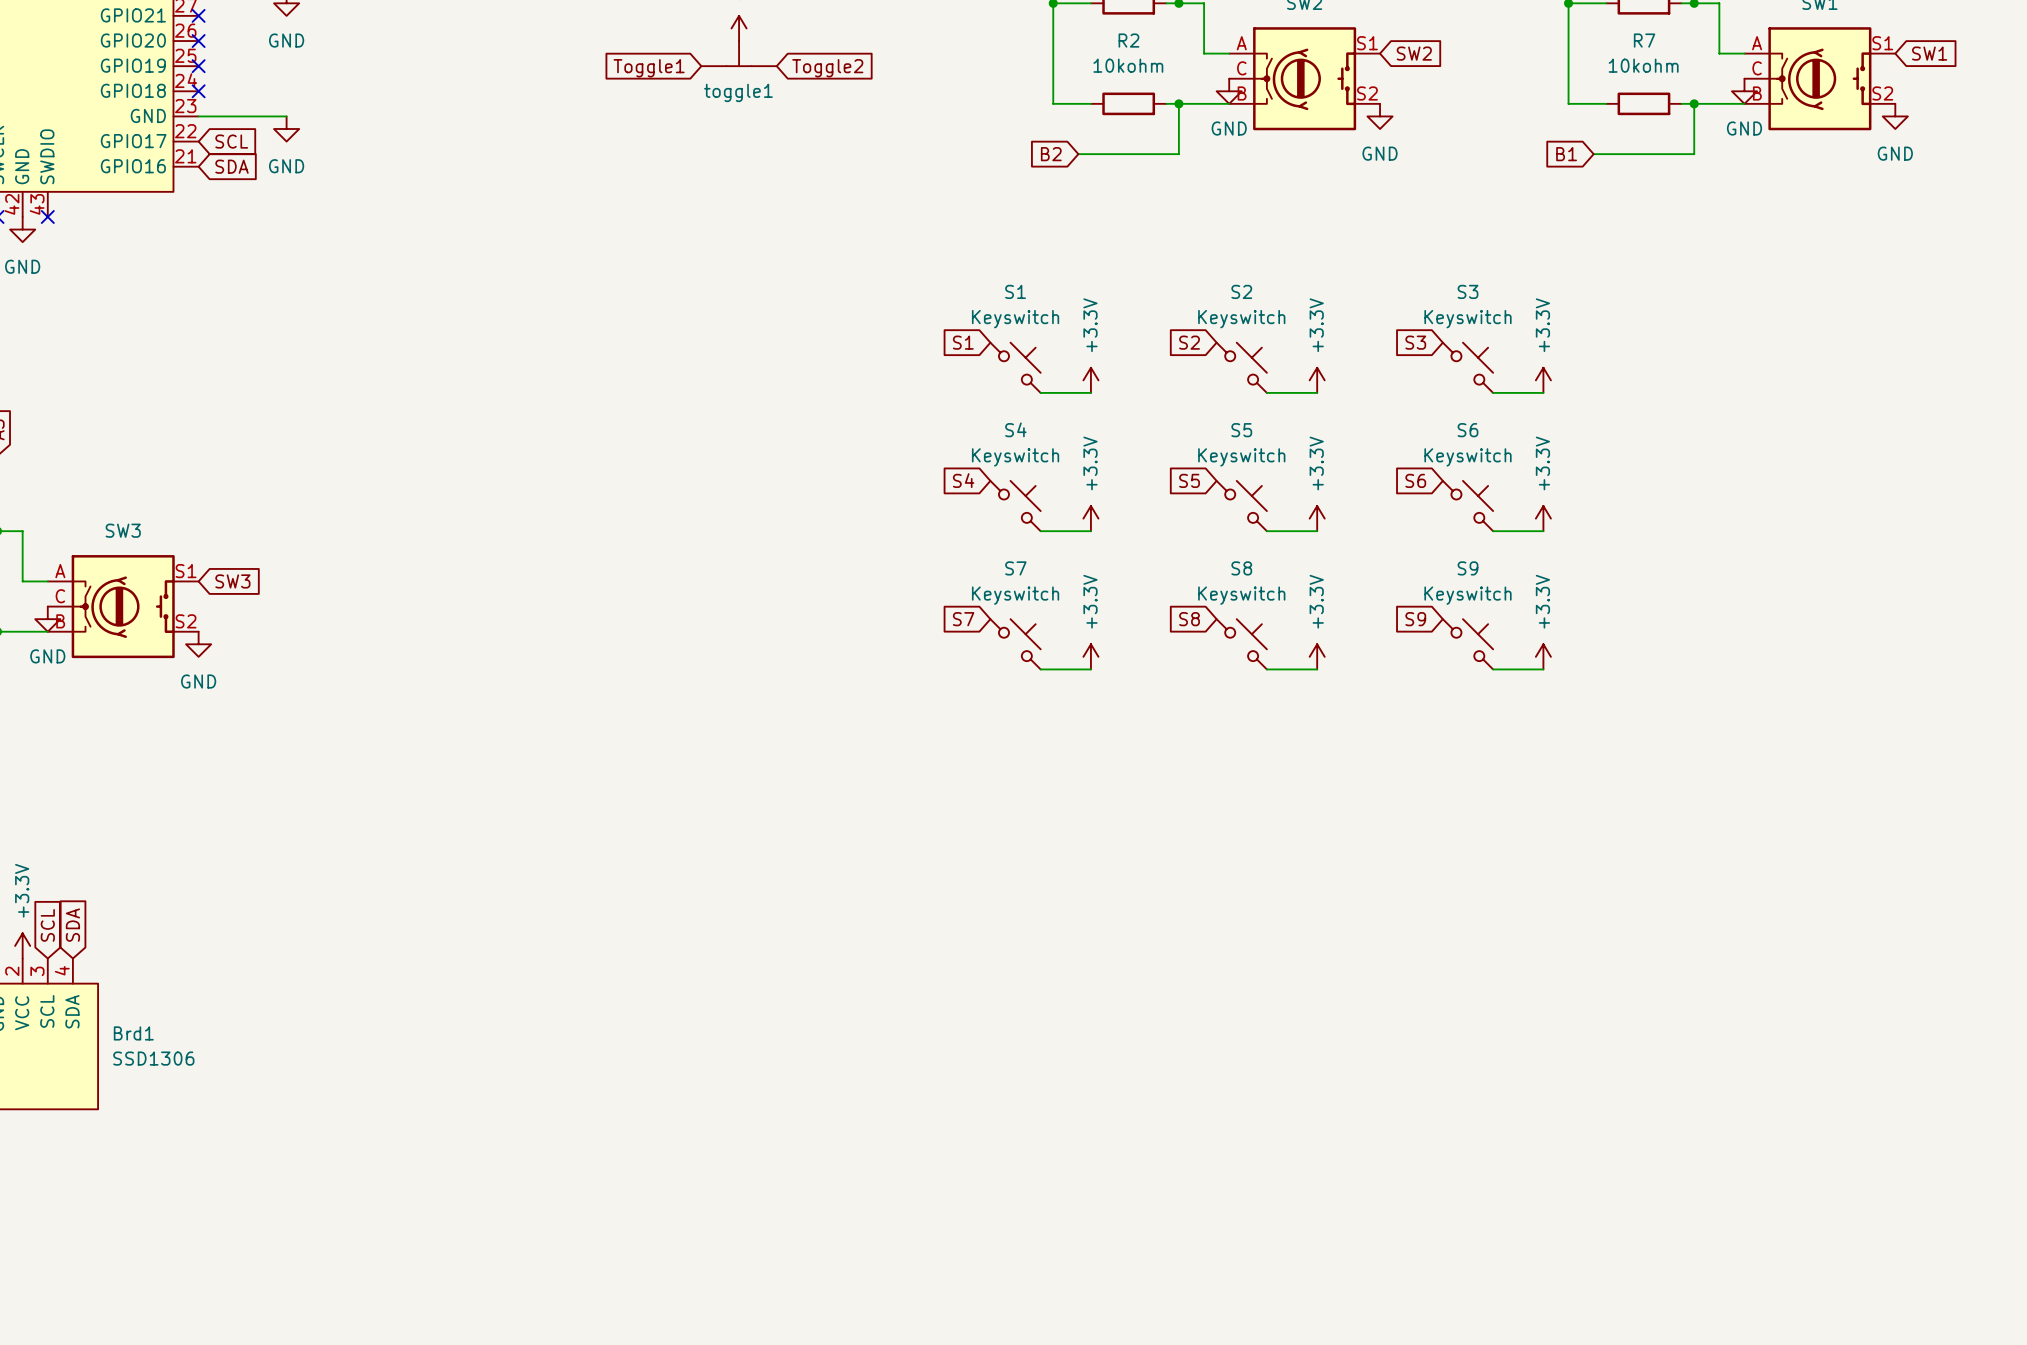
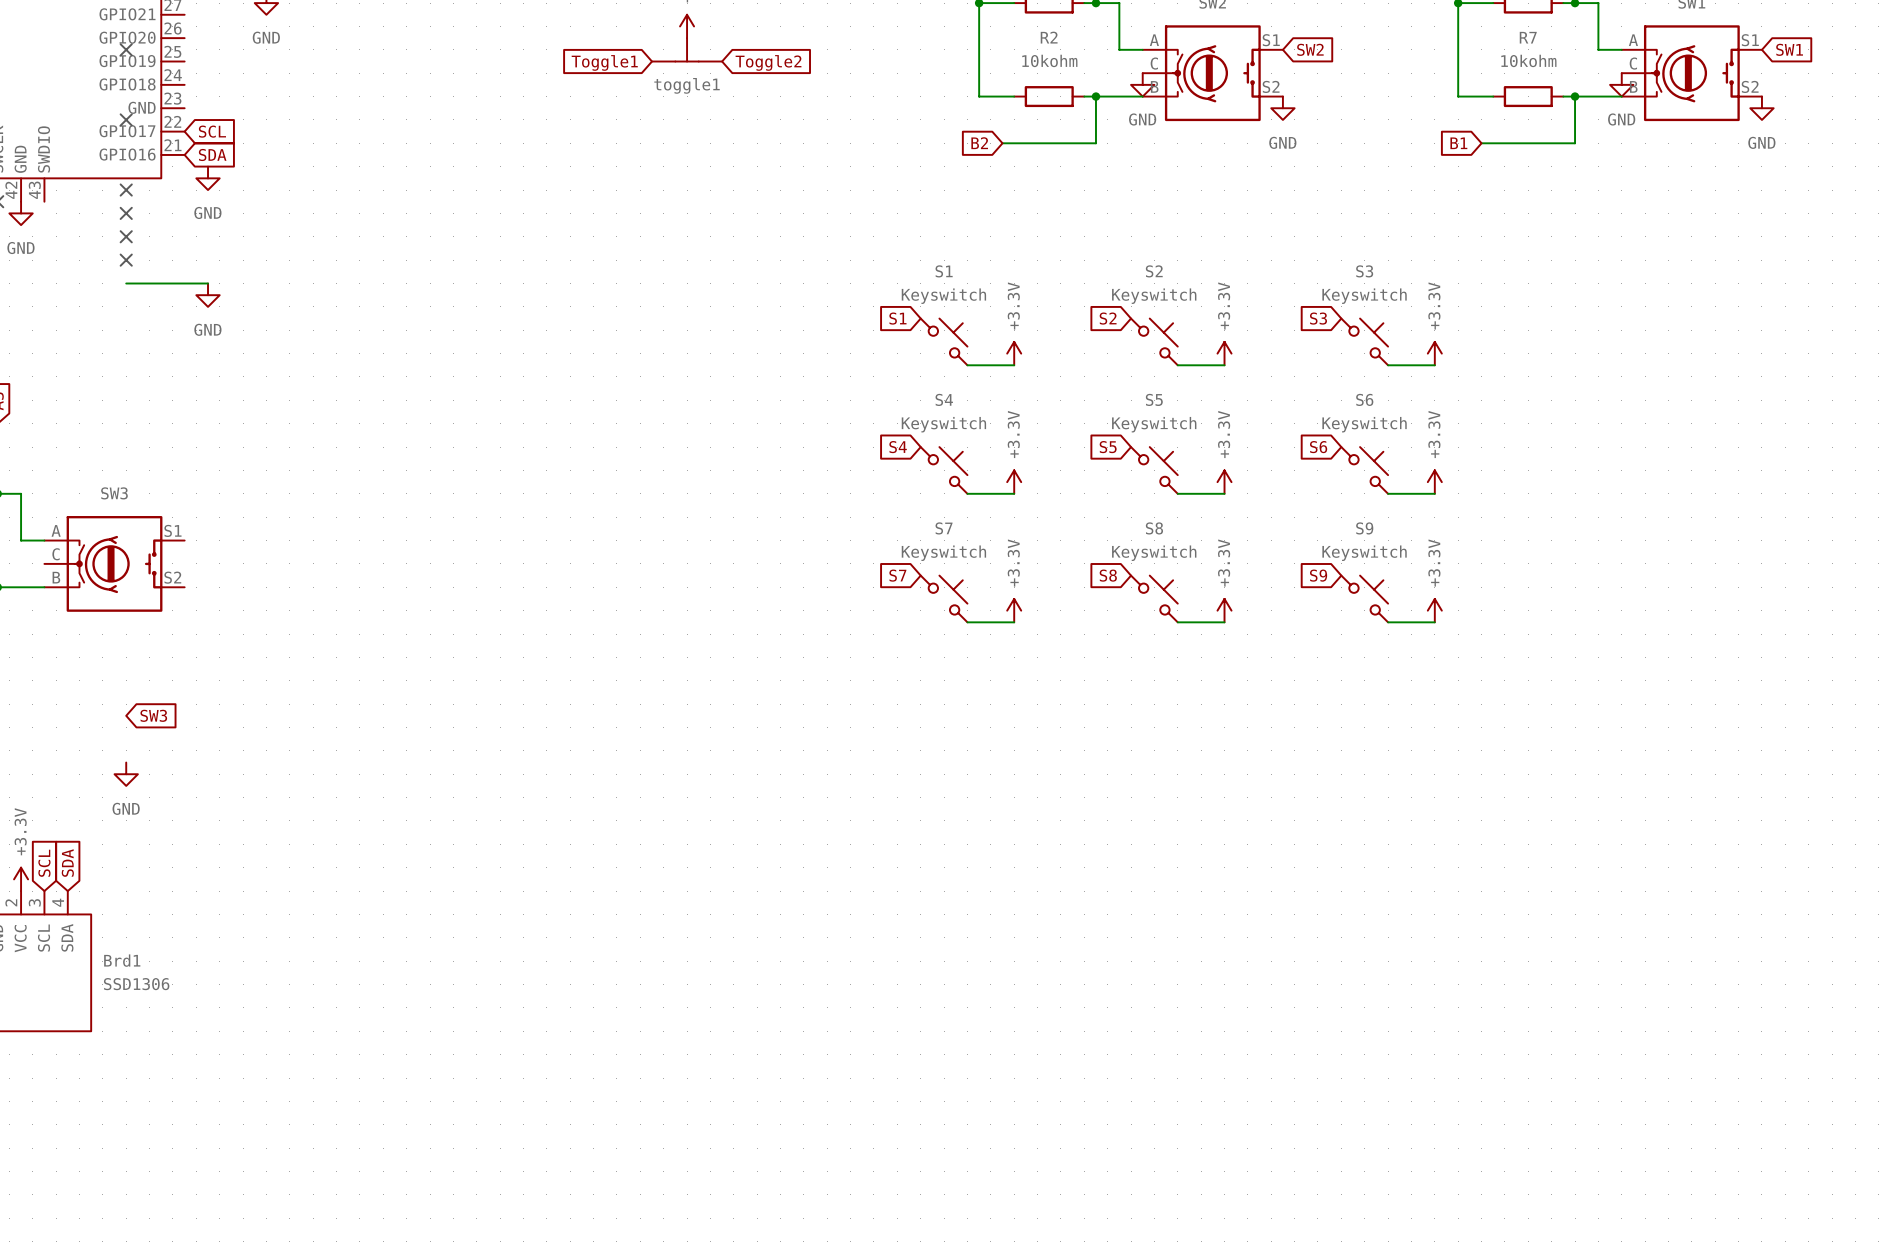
no-connect mark: (198, 15) -> none
no-connect mark: (198, 41) -> none
no-connect mark: none -> (126, 49)
no-connect mark: (198, 66) -> none
no-connect mark: (198, 91) -> none
wire: (198, 116) (286, 116) -> (126, 283) (208, 283)
no-connect mark: none -> (126, 119)
power symbol position: GND (286, 129) -> GND (208, 178)
no-connect mark: none -> (126, 190)
no-connect mark: (47, 216) -> none
no-connect mark: none -> (126, 213)
no-connect mark: none -> (126, 236)
no-connect mark: none -> (126, 260)
power symbol: none -> GND (208, 295)
global label position: SW3 (232, 581) -> SW3 (153, 715)
power symbol: GND (47, 619) -> none
power symbol: GND (198, 644) -> none
power symbol: none -> GND (126, 774)

